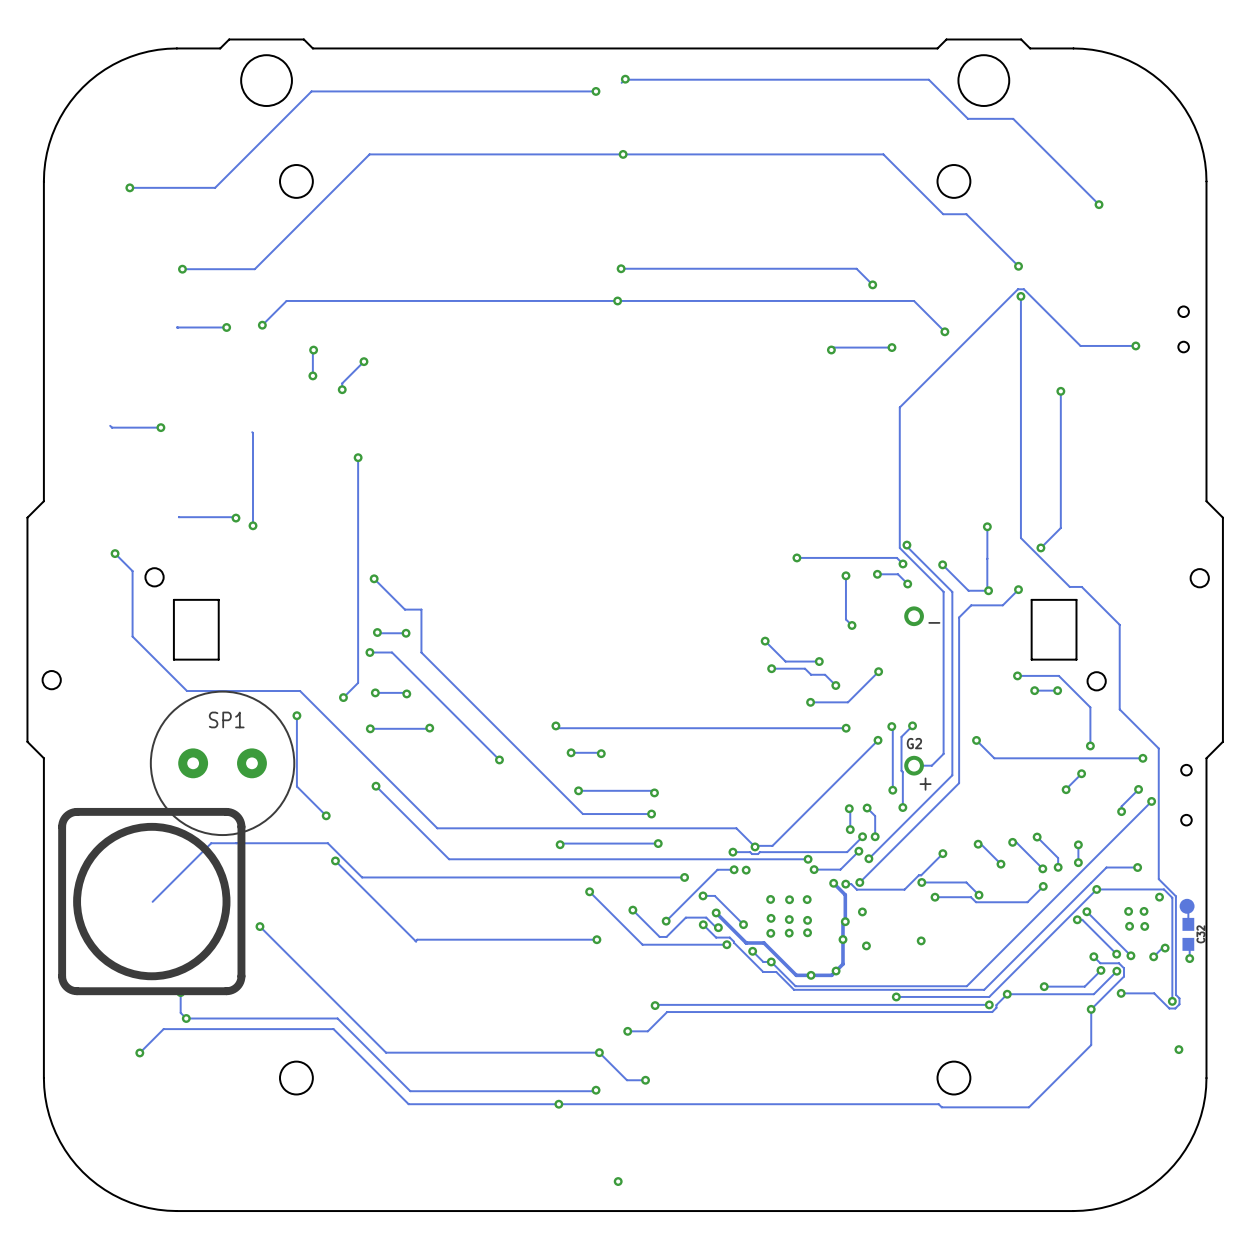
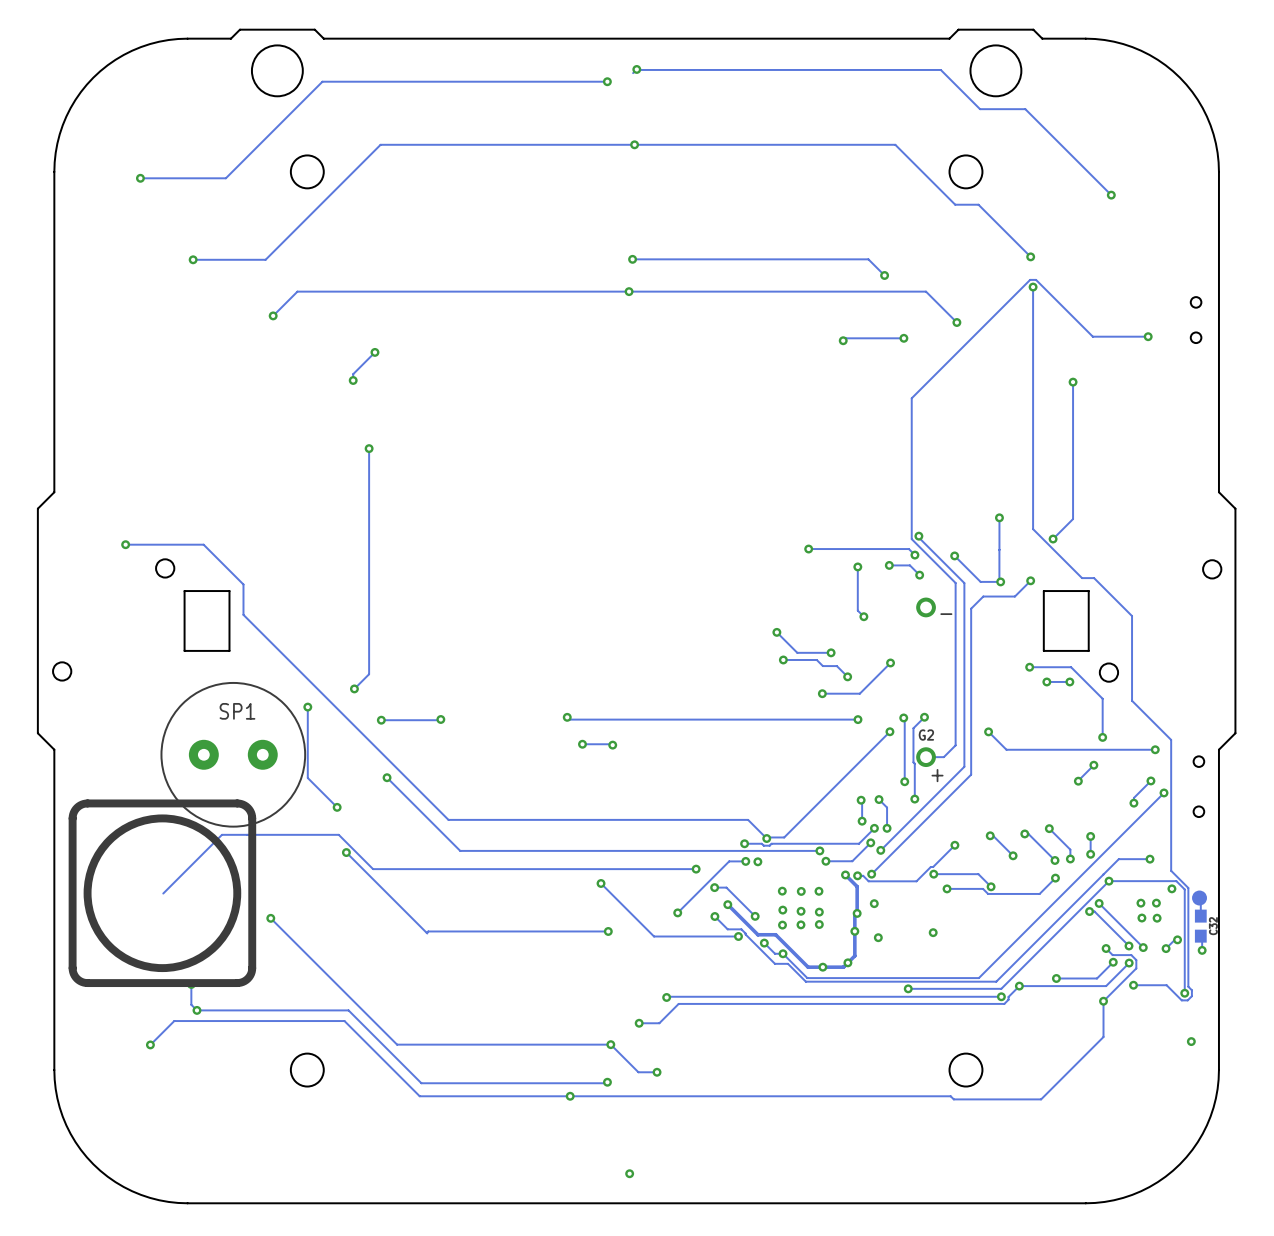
track: (177, 327) (226, 327) -> none
via: (226, 327) -> none
track: (313, 350) (312, 375) -> none
via: (313, 350) -> none
via: (312, 375) -> none
track: (110, 425) (112, 427) (160, 427) -> none
via: (160, 427) -> none
track: (252, 432) (253, 525) -> none
track: (178, 517) (235, 518) -> none
via: (235, 518) -> none
via: (253, 525) -> none
track: (115, 553) (132, 571) (132, 636) (187, 691) (300, 691) -> (125, 544) (203, 544) (243, 584) (243, 614) (310, 682)
track: (374, 578) (404, 609) (421, 609) (421, 652) (582, 814) (651, 814) -> none
via: (374, 578) -> none
track: (377, 632) (406, 633) -> none
via: (377, 632) -> none
via: (406, 633) -> none
track: (369, 652) (392, 652) (499, 759) -> none
via: (369, 652) -> none
track: (375, 692) (406, 693) -> none
via: (375, 692) -> none
via: (406, 693) -> none
via: (499, 759) -> none
track: (578, 790) (652, 790) (654, 792) -> none
via: (578, 790) -> none
via: (654, 792) -> none
via: (651, 814) -> none
track: (658, 843) (560, 844) -> none
via: (658, 843) -> none
via: (560, 844) -> none
track: (632, 910) (659, 936) (666, 936) (685, 917) (706, 917) (718, 927) -> none
via: (632, 910) -> none
via: (718, 927) -> none

